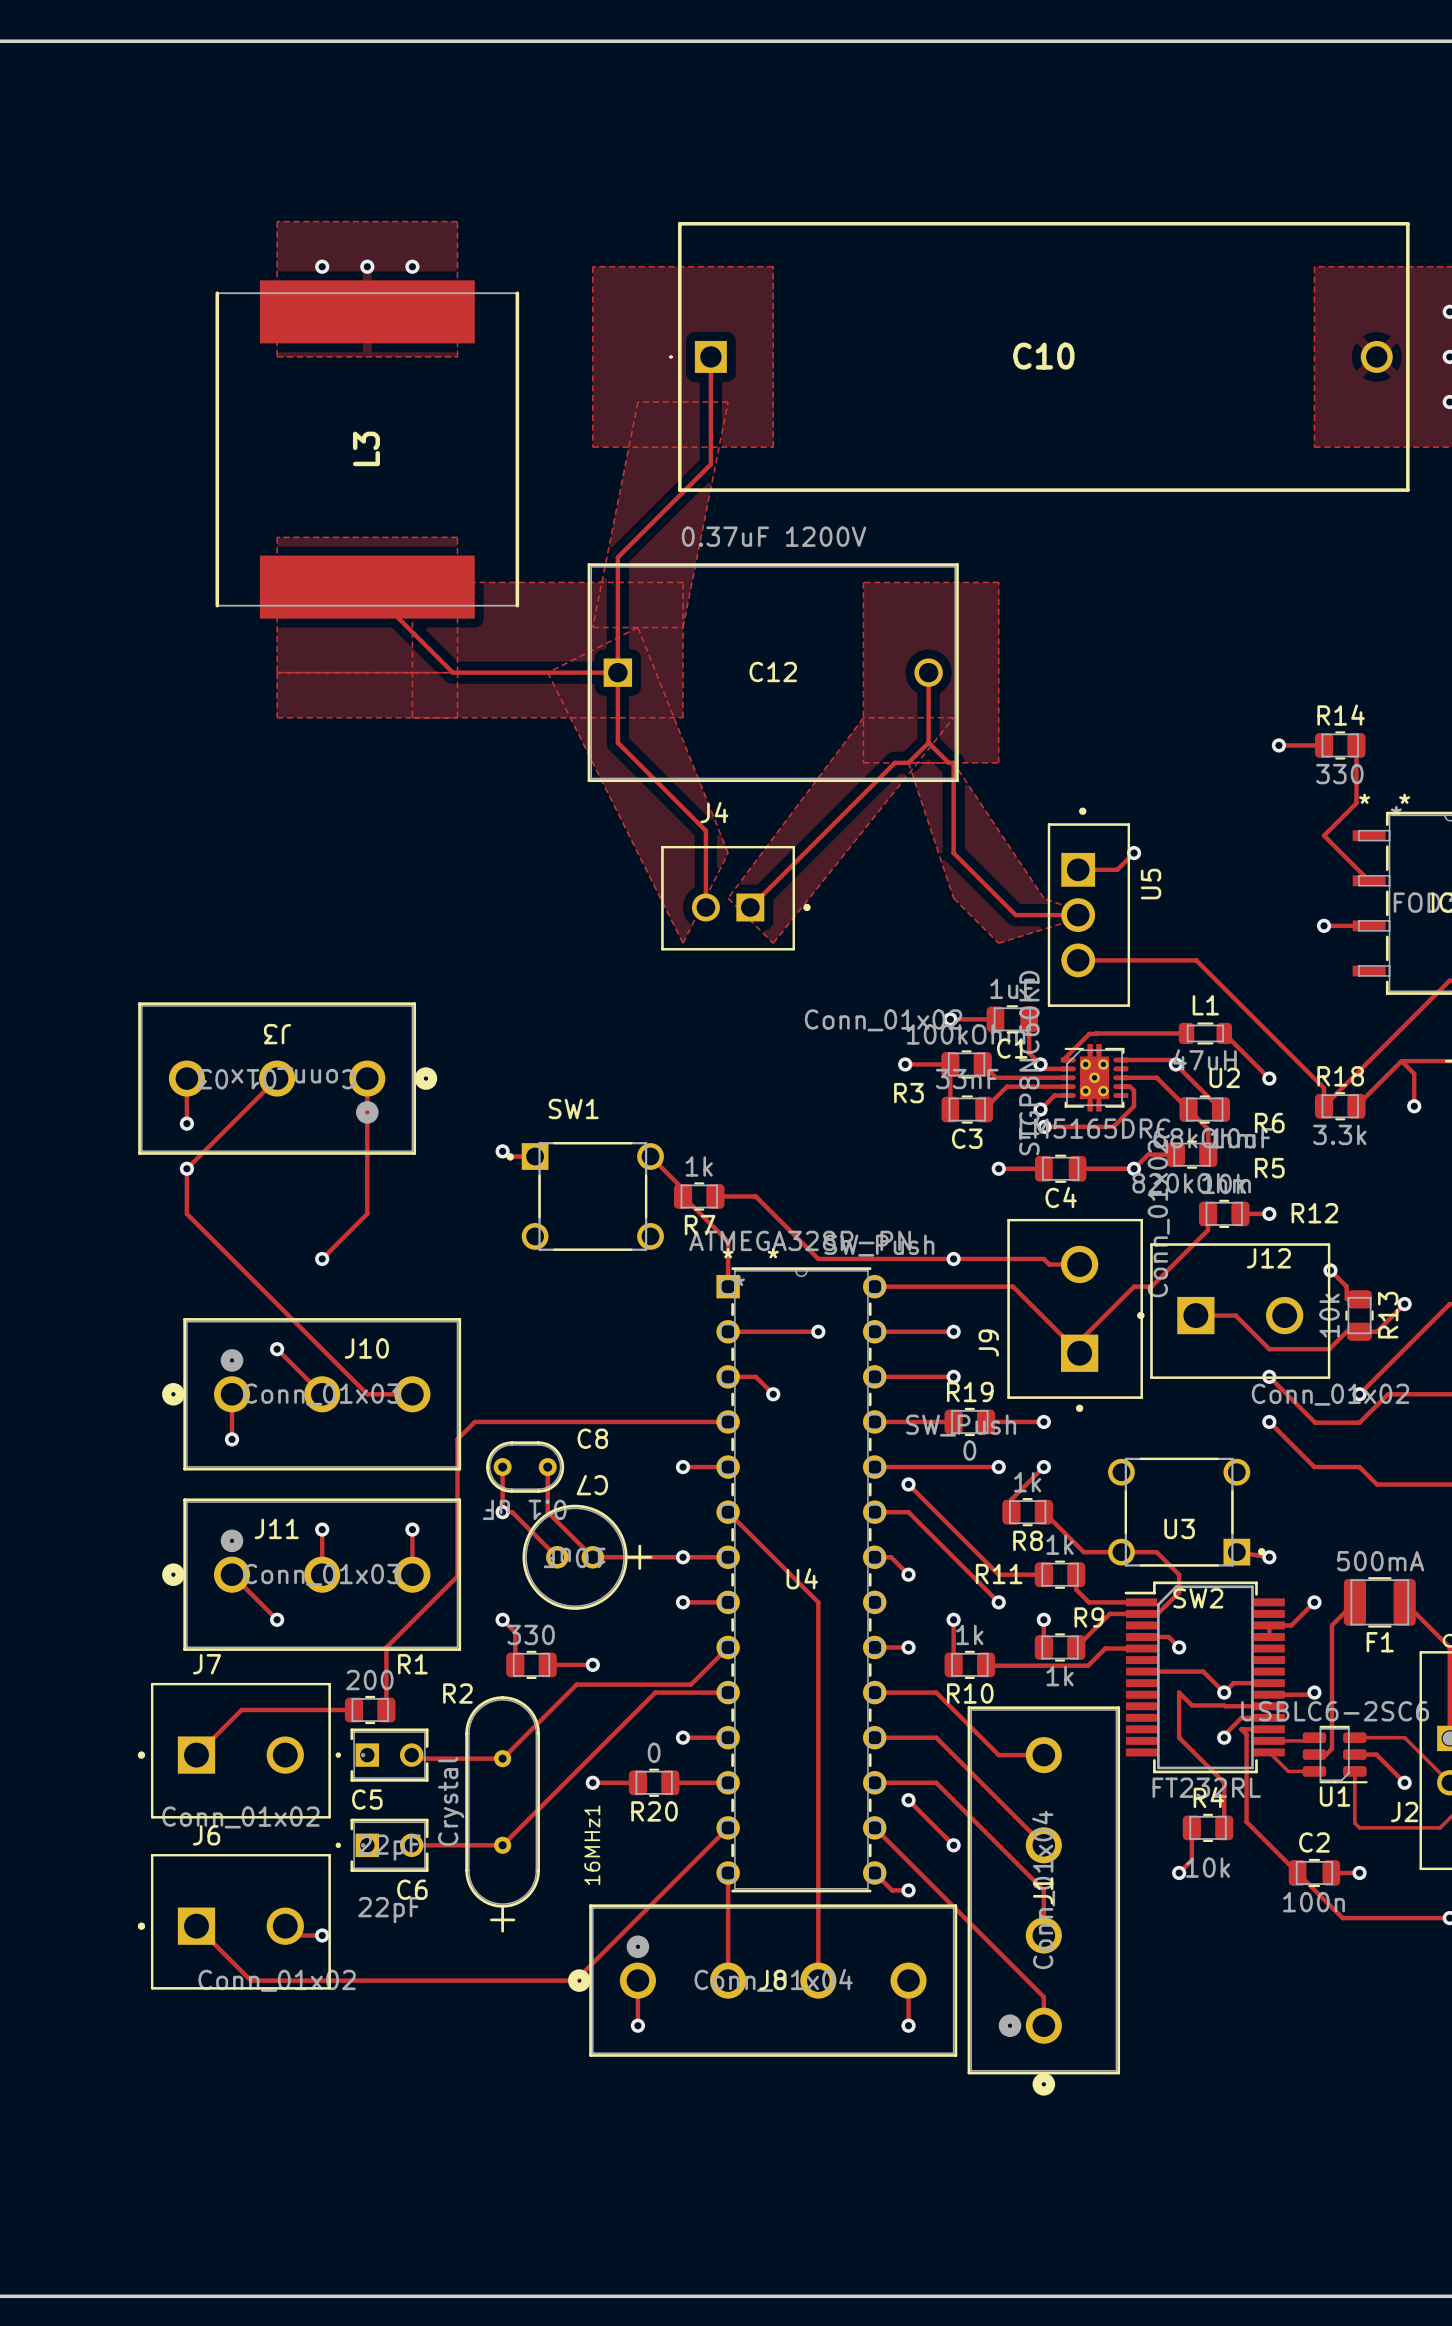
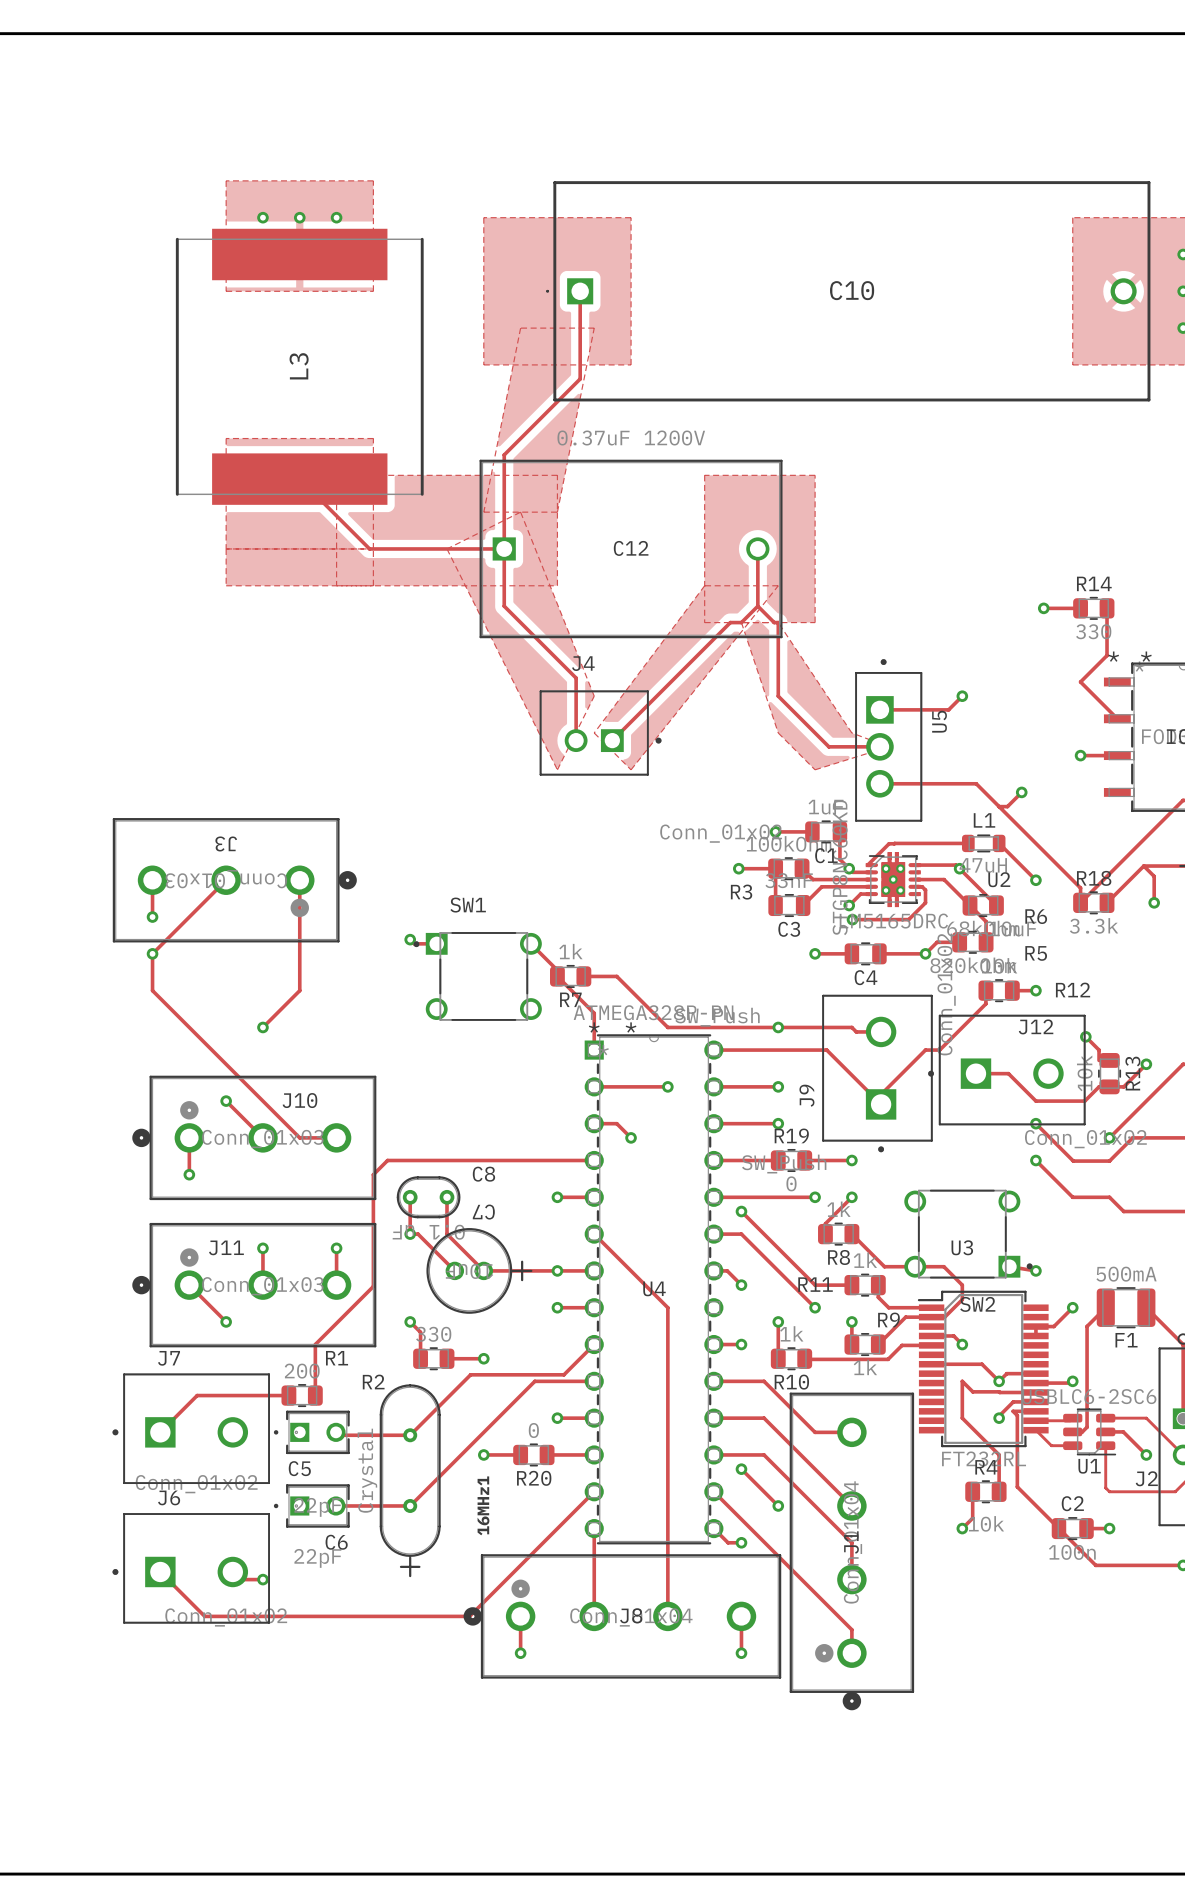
track: (1134, 853) (1117, 869) -> (962, 696) (948, 709) (911, 709)
via position: (1134, 853) -> (962, 696)
track: none -> (1021, 792) (1007, 806) (999, 806)
via: none -> (1021, 792)

